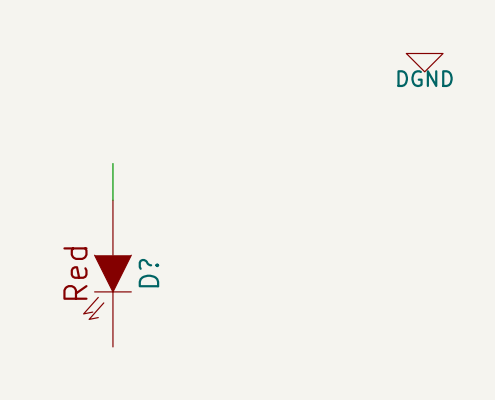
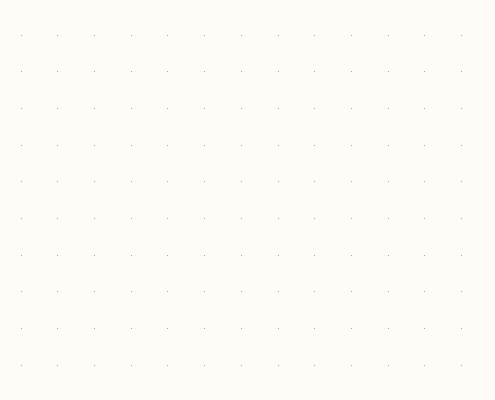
power symbol: DGND (424, 62) -> none
wire: (112, 163) (112, 200) -> none
D?: (107, 273) -> none

